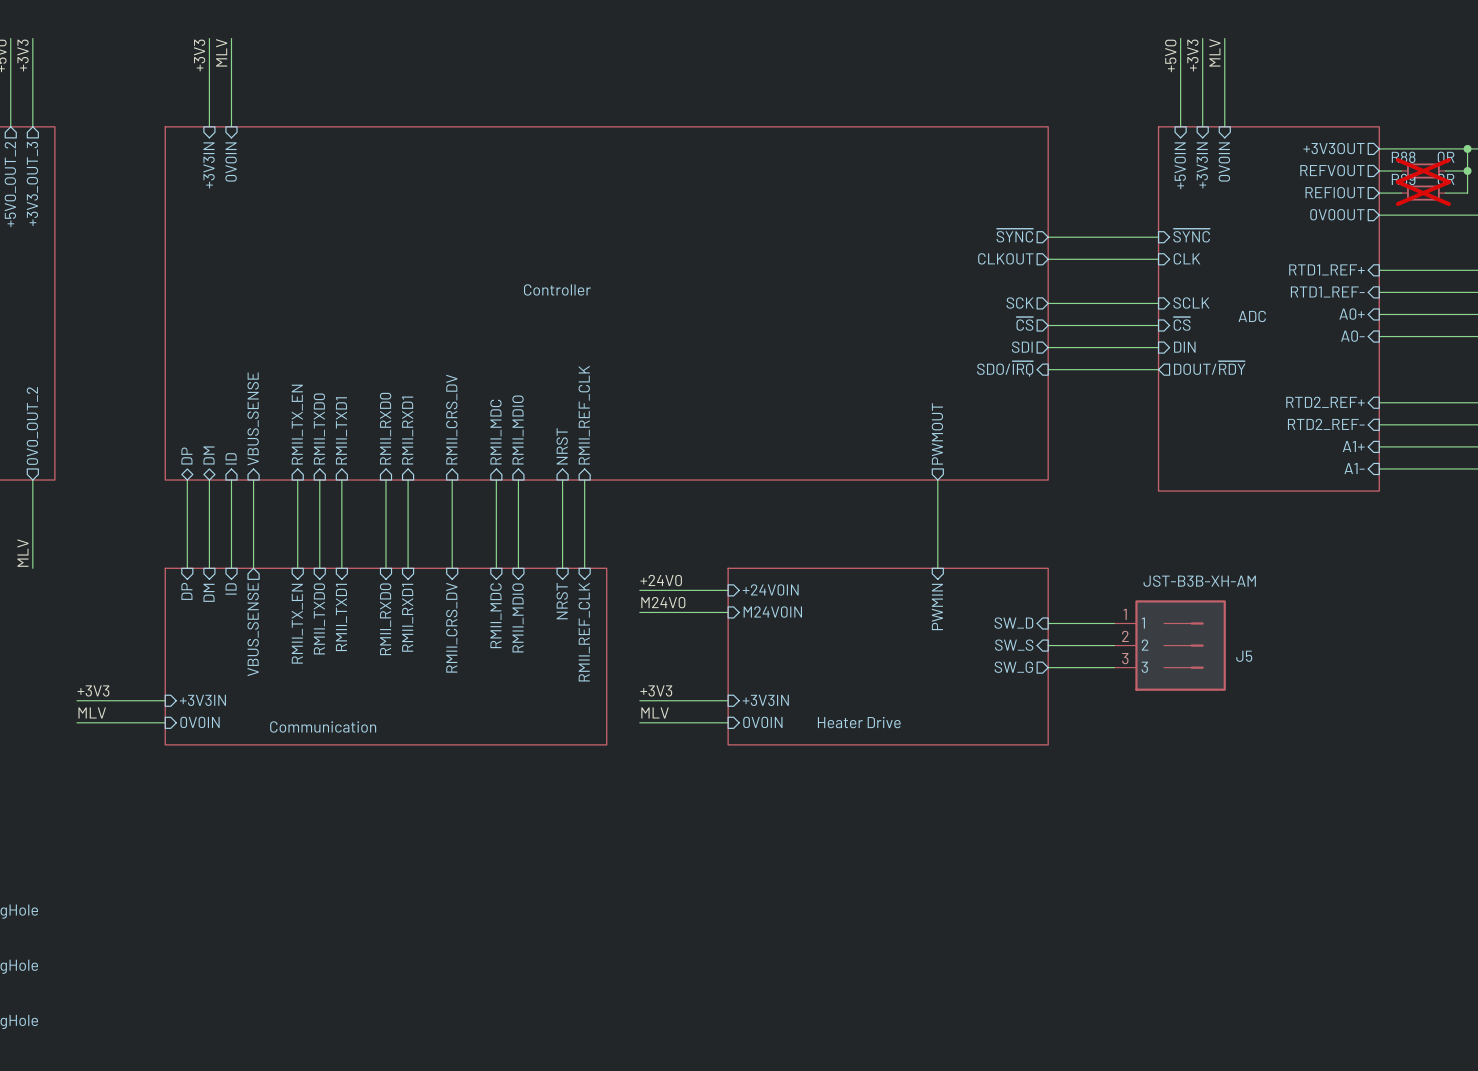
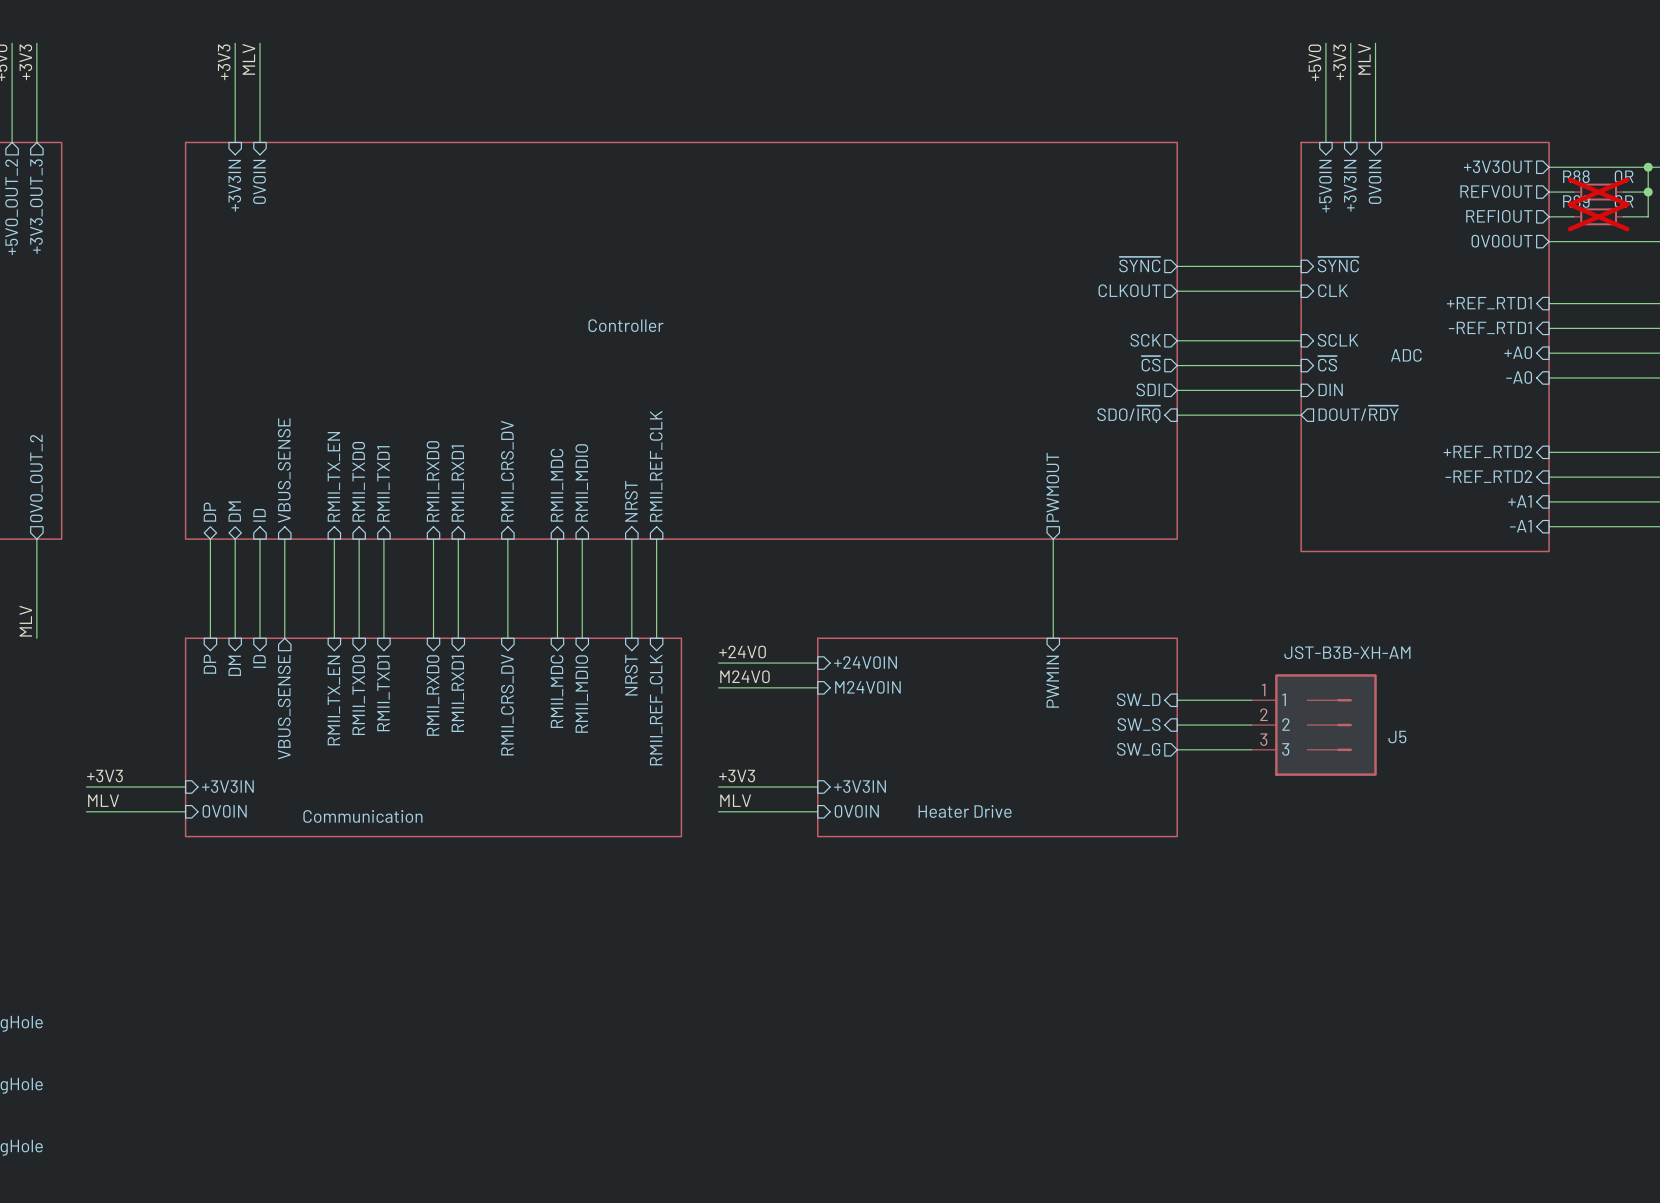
sheet pin: RTD1_REF+ (1326, 269) -> +REF_RTD1 (1489, 303)
sheet pin: RTD1_REF- (1327, 291) -> -REF_RTD1 (1490, 327)
sheet pin: A0+ (1352, 314) -> +A0 (1518, 352)
sheet pin: A0- (1352, 336) -> -A0 (1519, 377)
sheet pin: RTD2_REF+ (1325, 402) -> +REF_RTD2 (1487, 451)
sheet pin: RTD2_REF- (1326, 424) -> -REF_RTD2 (1488, 476)
sheet pin: A1+ (1353, 446) -> +A1 (1519, 501)
sheet pin: A1- (1354, 468) -> -A1 (1520, 526)

